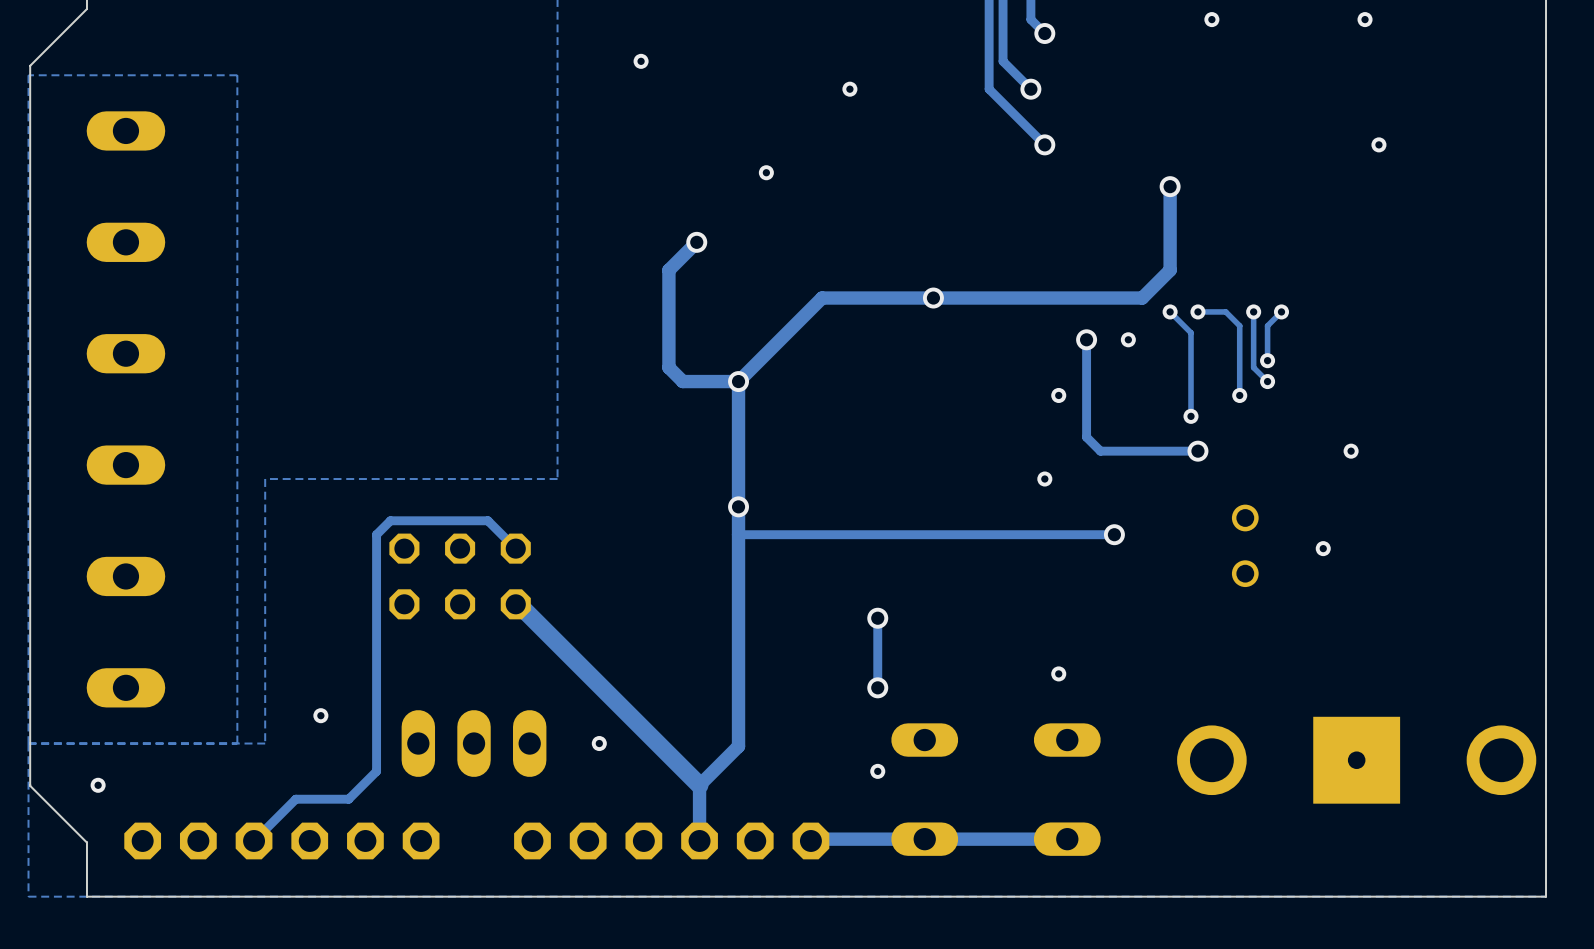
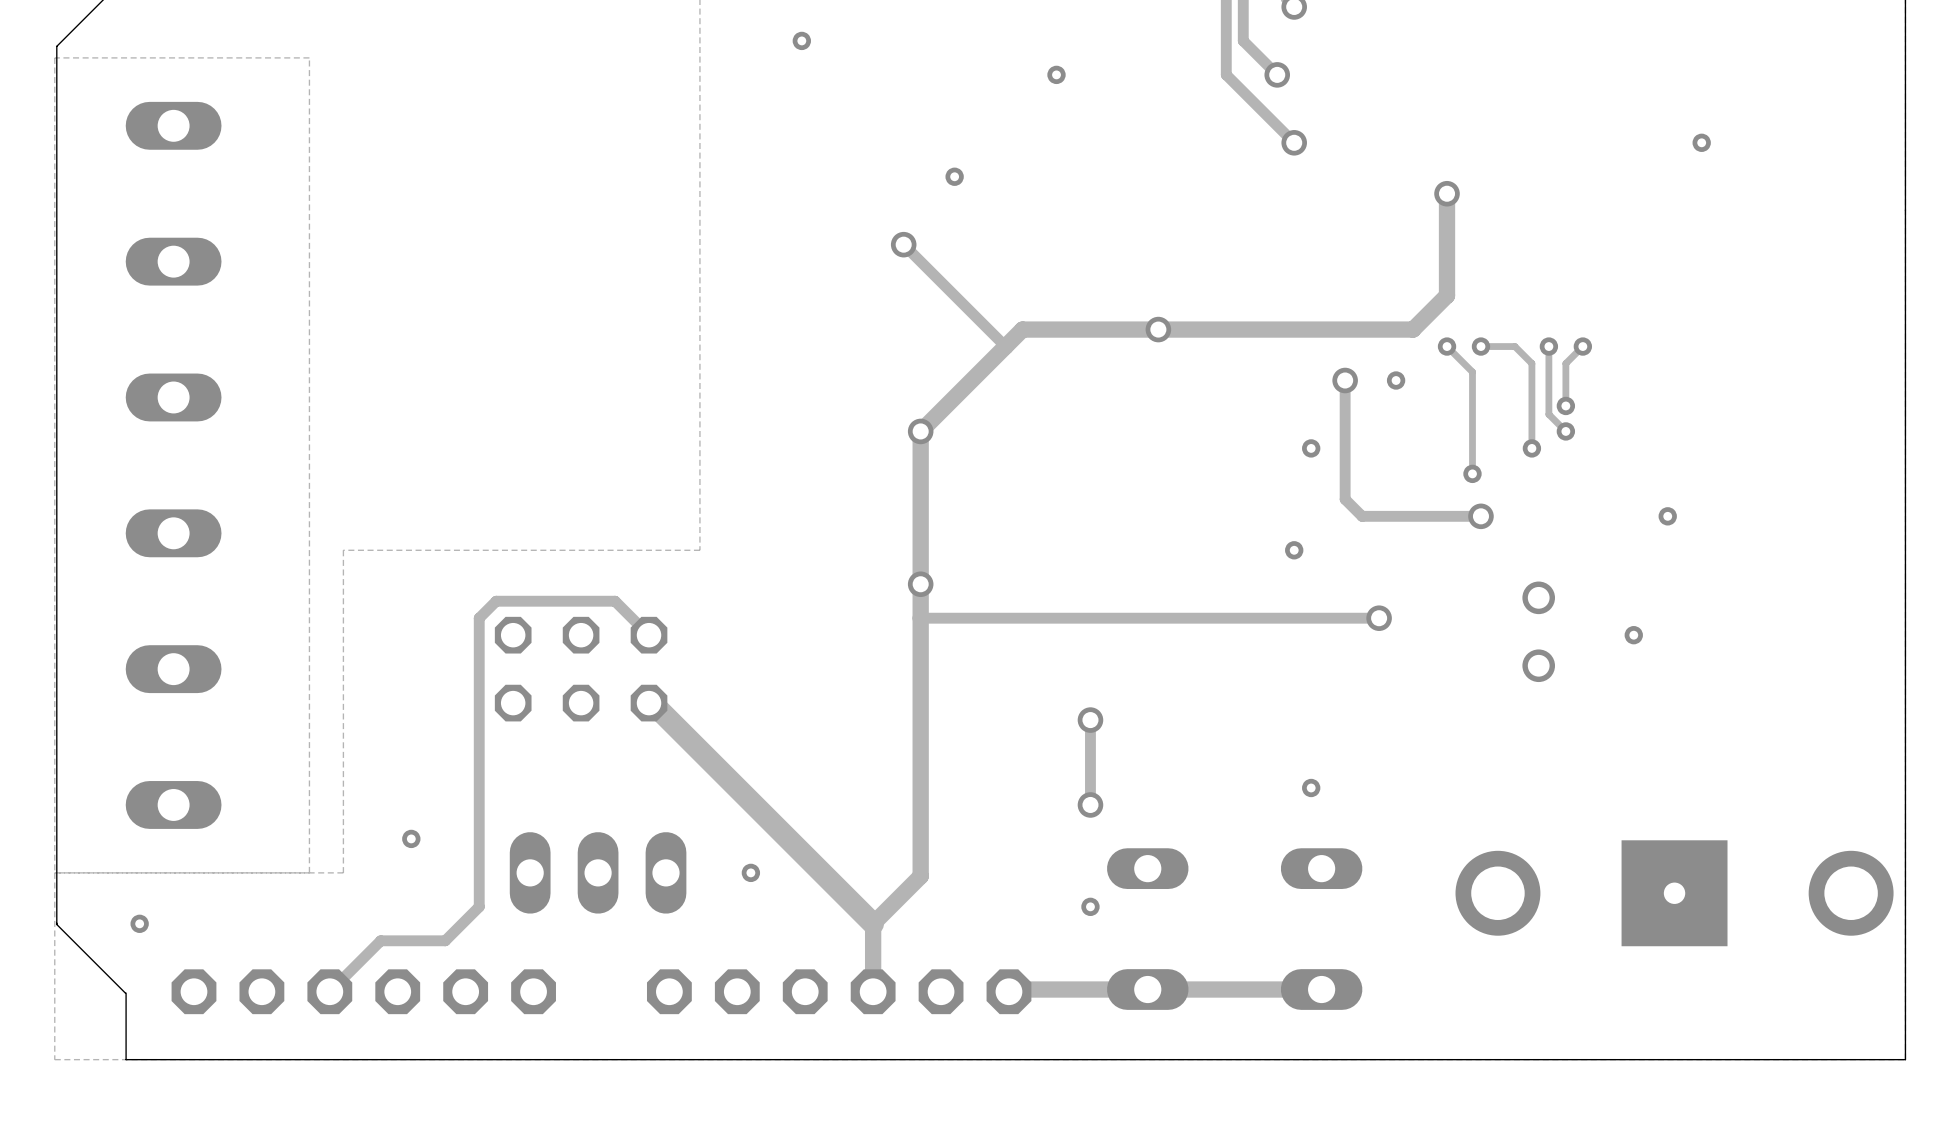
track: none -> (903, 244) (1005, 346)
track: (696, 242) (668, 270) (668, 367) (682, 381) (738, 381) -> none
via position: (696, 242) -> (903, 244)

